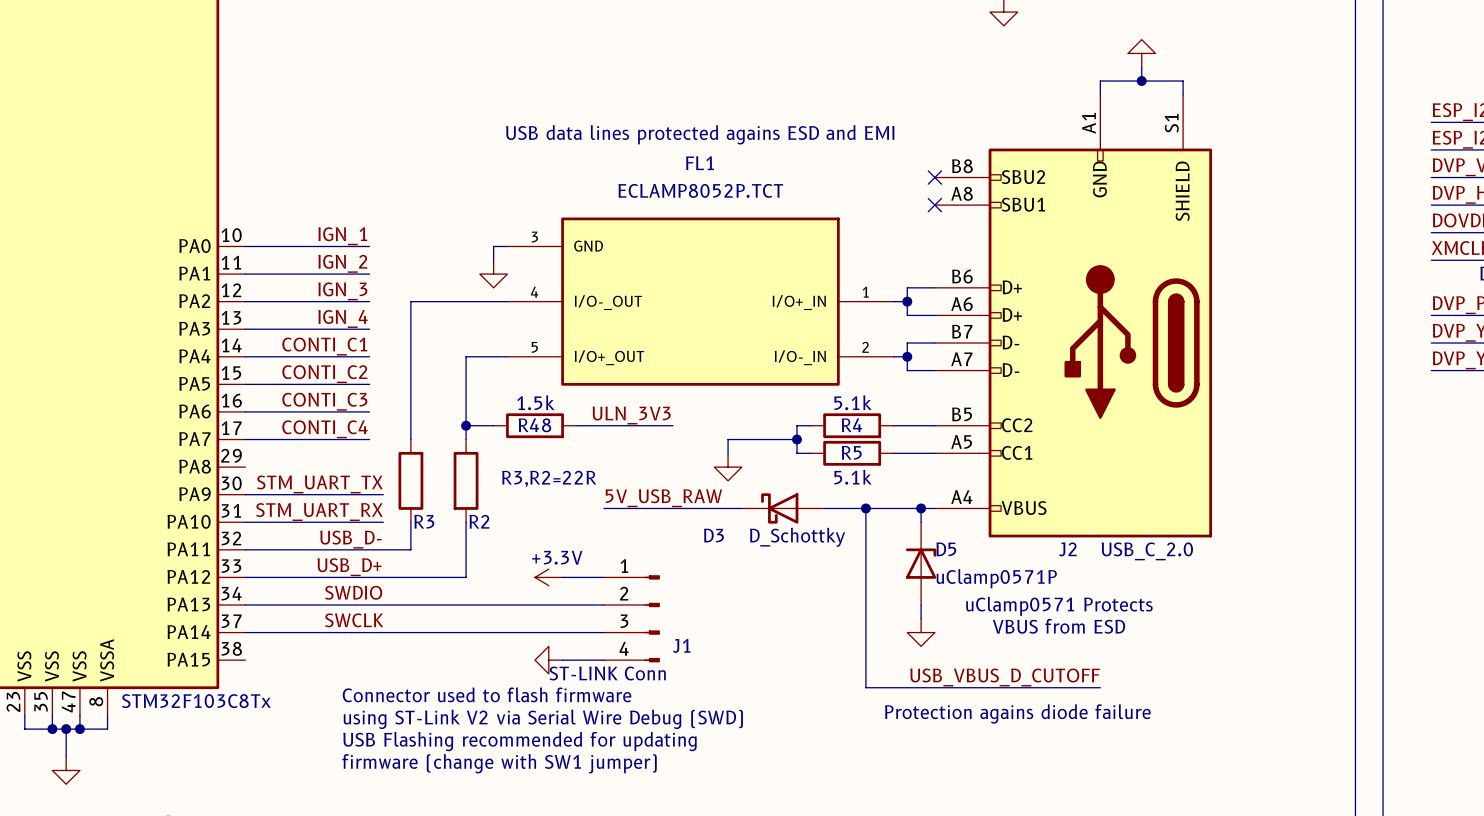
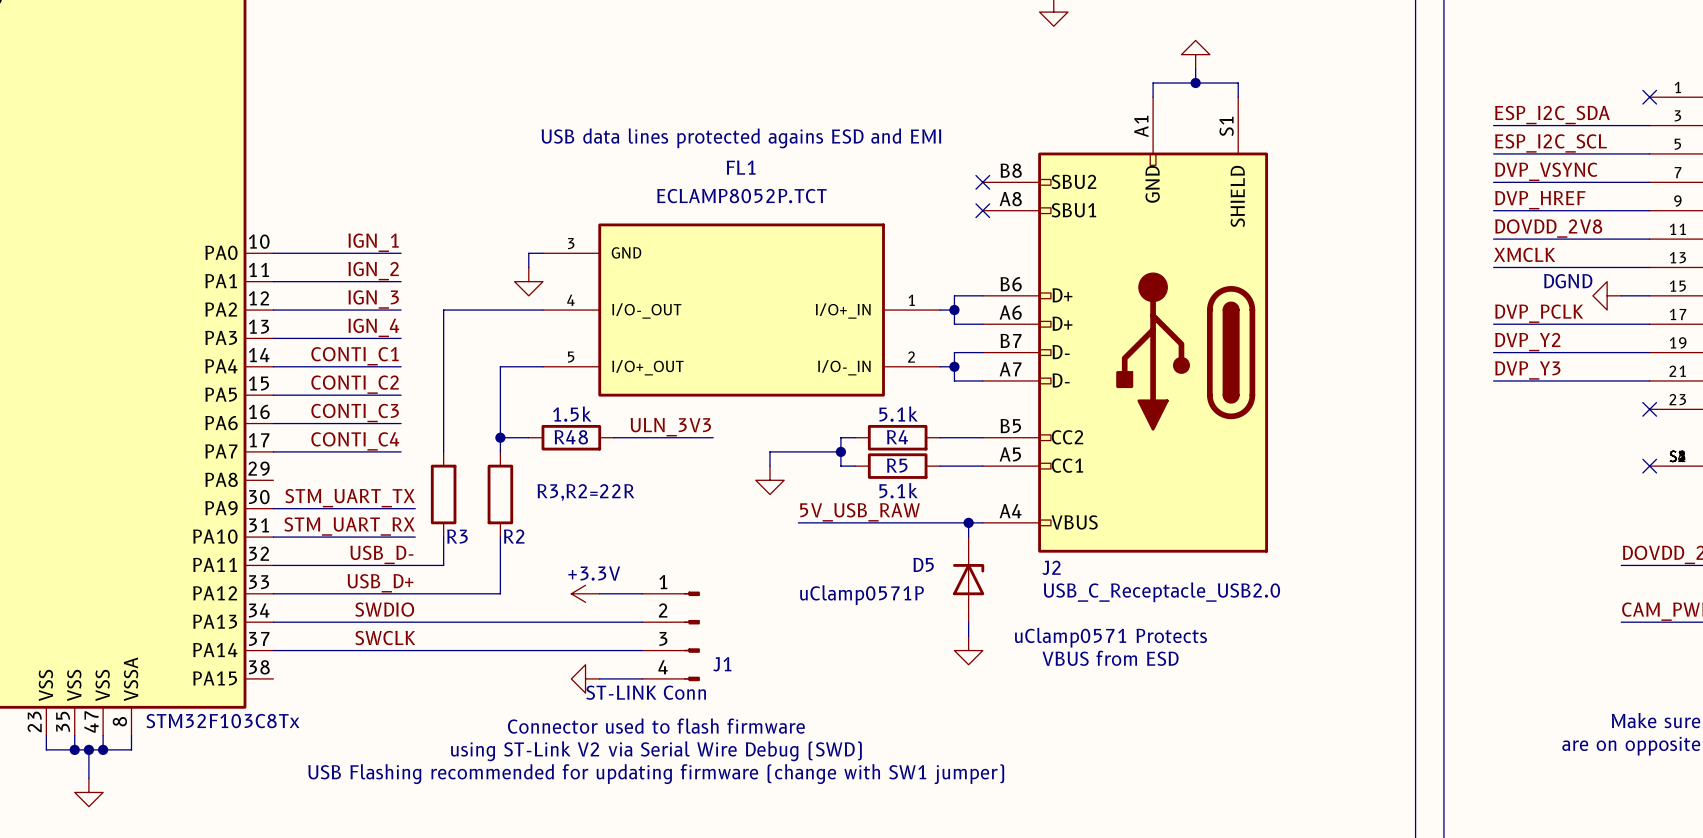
label position: 5V_USB_RAW (663, 498) -> 5V_USB_RAW (860, 512)
wire: (603, 508) (741, 508) -> none
D3: D_Schottky (783, 508) -> none
wire: (865, 508) (865, 687) (1100, 687) -> none
junction: (865, 508) -> none
D5 name position: D5 (946, 549) -> D5 (923, 564)
J2 name position: J2 (1067, 549) -> J2 (1051, 567)
J2 value: USB_C_2.0 (1147, 551) -> USB_C_Receptacle_USB2.0 (1161, 592)
D5 value position: uClamp0571P (996, 578) -> uClamp0571P (862, 595)
text position: uClamp0571 Protects (1059, 606) -> uClamp0571 Protects (1111, 637)
text position: VBUS from ESD (1059, 626) -> VBUS from ESD (1110, 658)
label: USB_VBUS_D_CUTOFF (1005, 677) -> none
text: Connector used to flash firmware (487, 694) -> none
text: none -> Connector used to flash firmware (656, 726)
text: Protection agains diode failure (1017, 713) -> none
text: using ST-Link V2 via Serial Wire Debug (SWD) (543, 719) -> none
text: none -> using ST-Link V2 via Serial Wire Debug (SWD) (656, 751)
text: USB Flashing recommended for updating (519, 741) -> none
text: none -> USB Flashing recommended for updating firmware (change with SW1 jumper) (656, 774)
text: firmware (change with SW1 jumper) (499, 763) -> none

